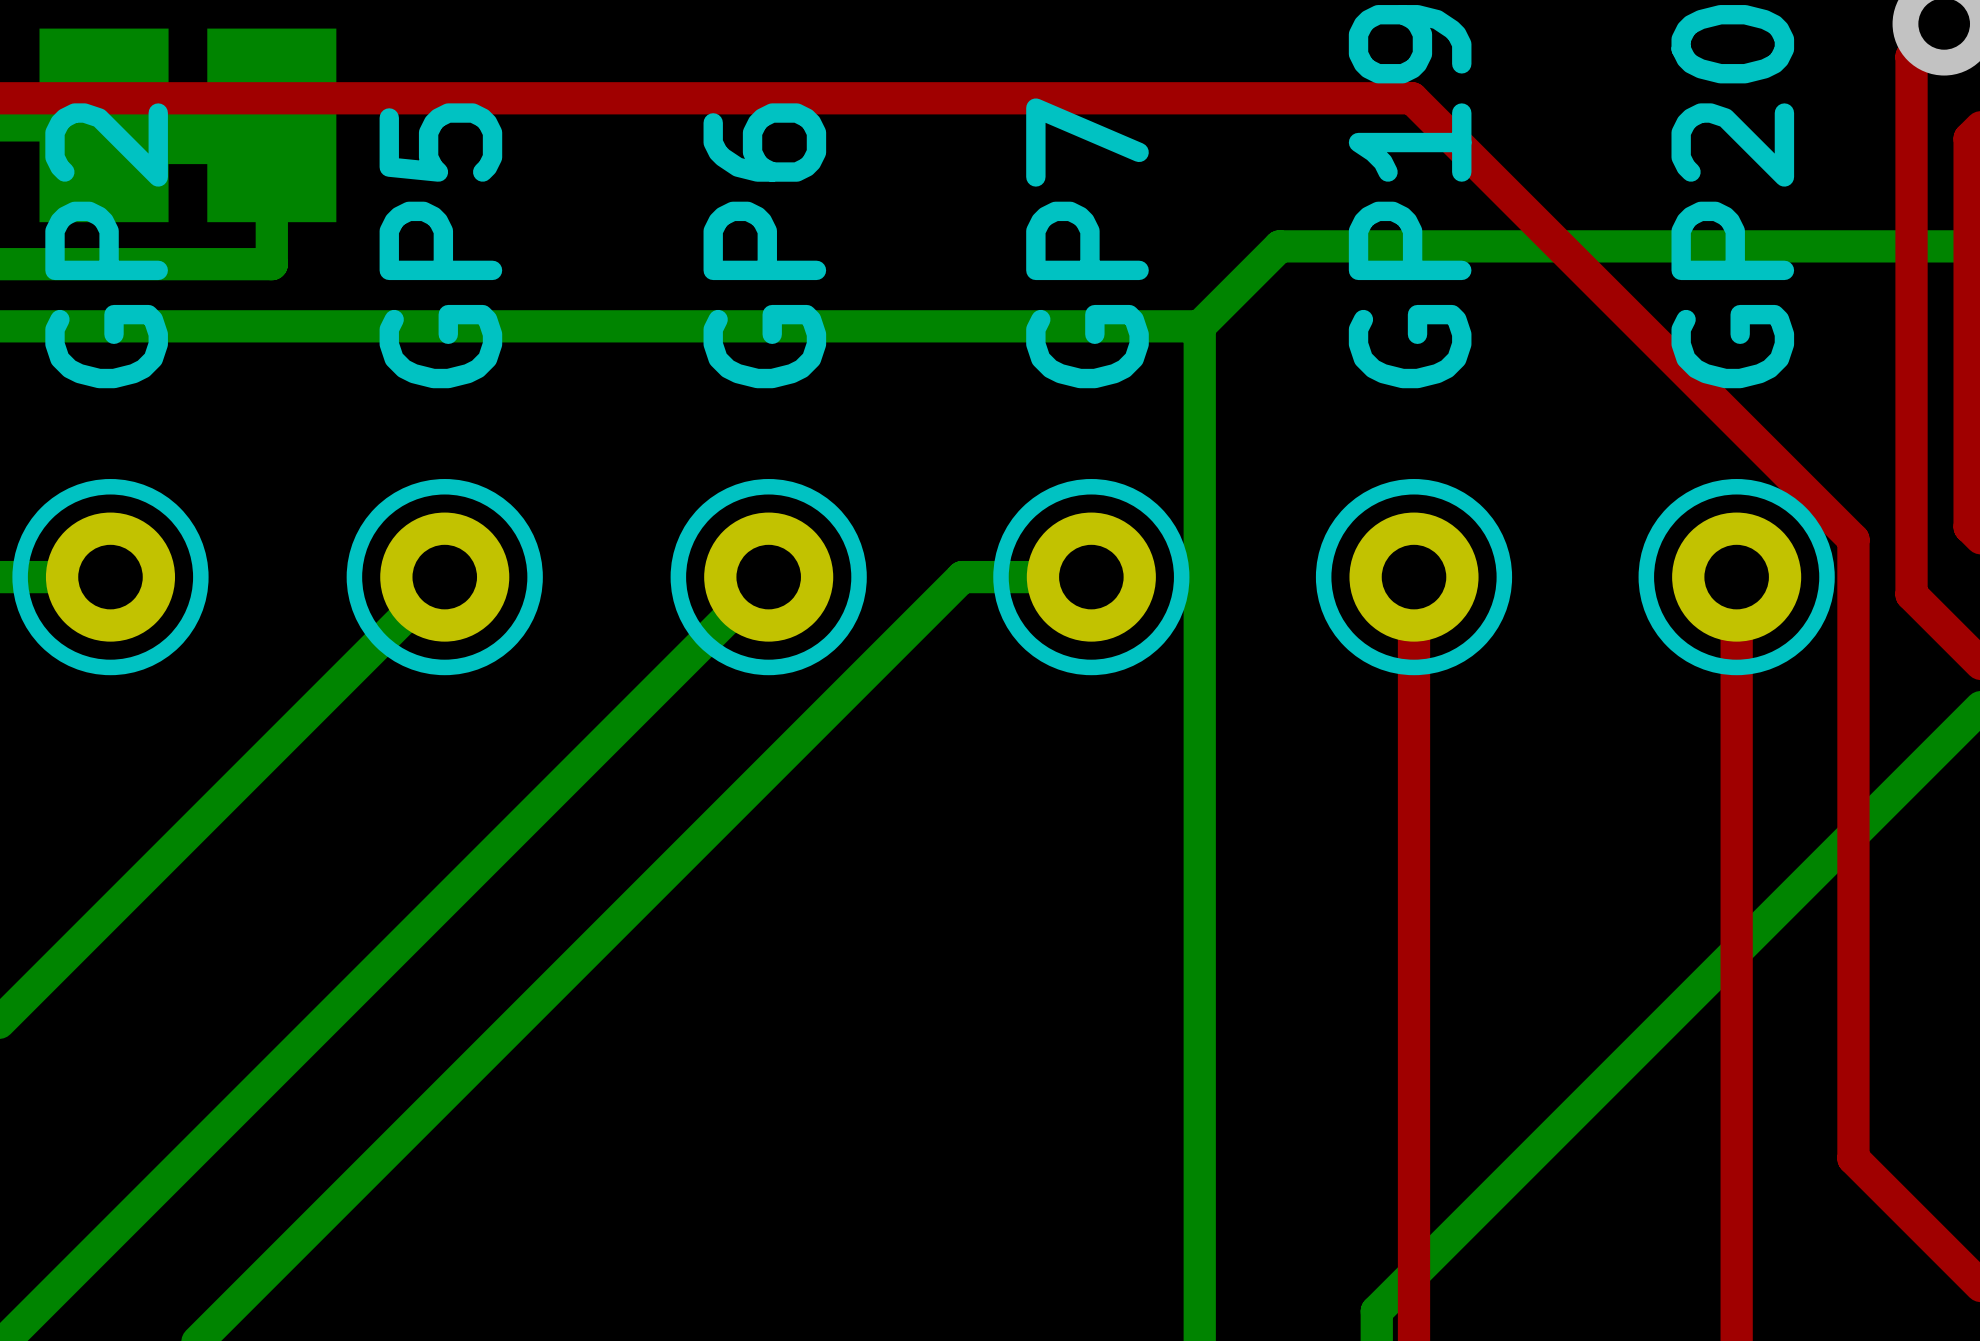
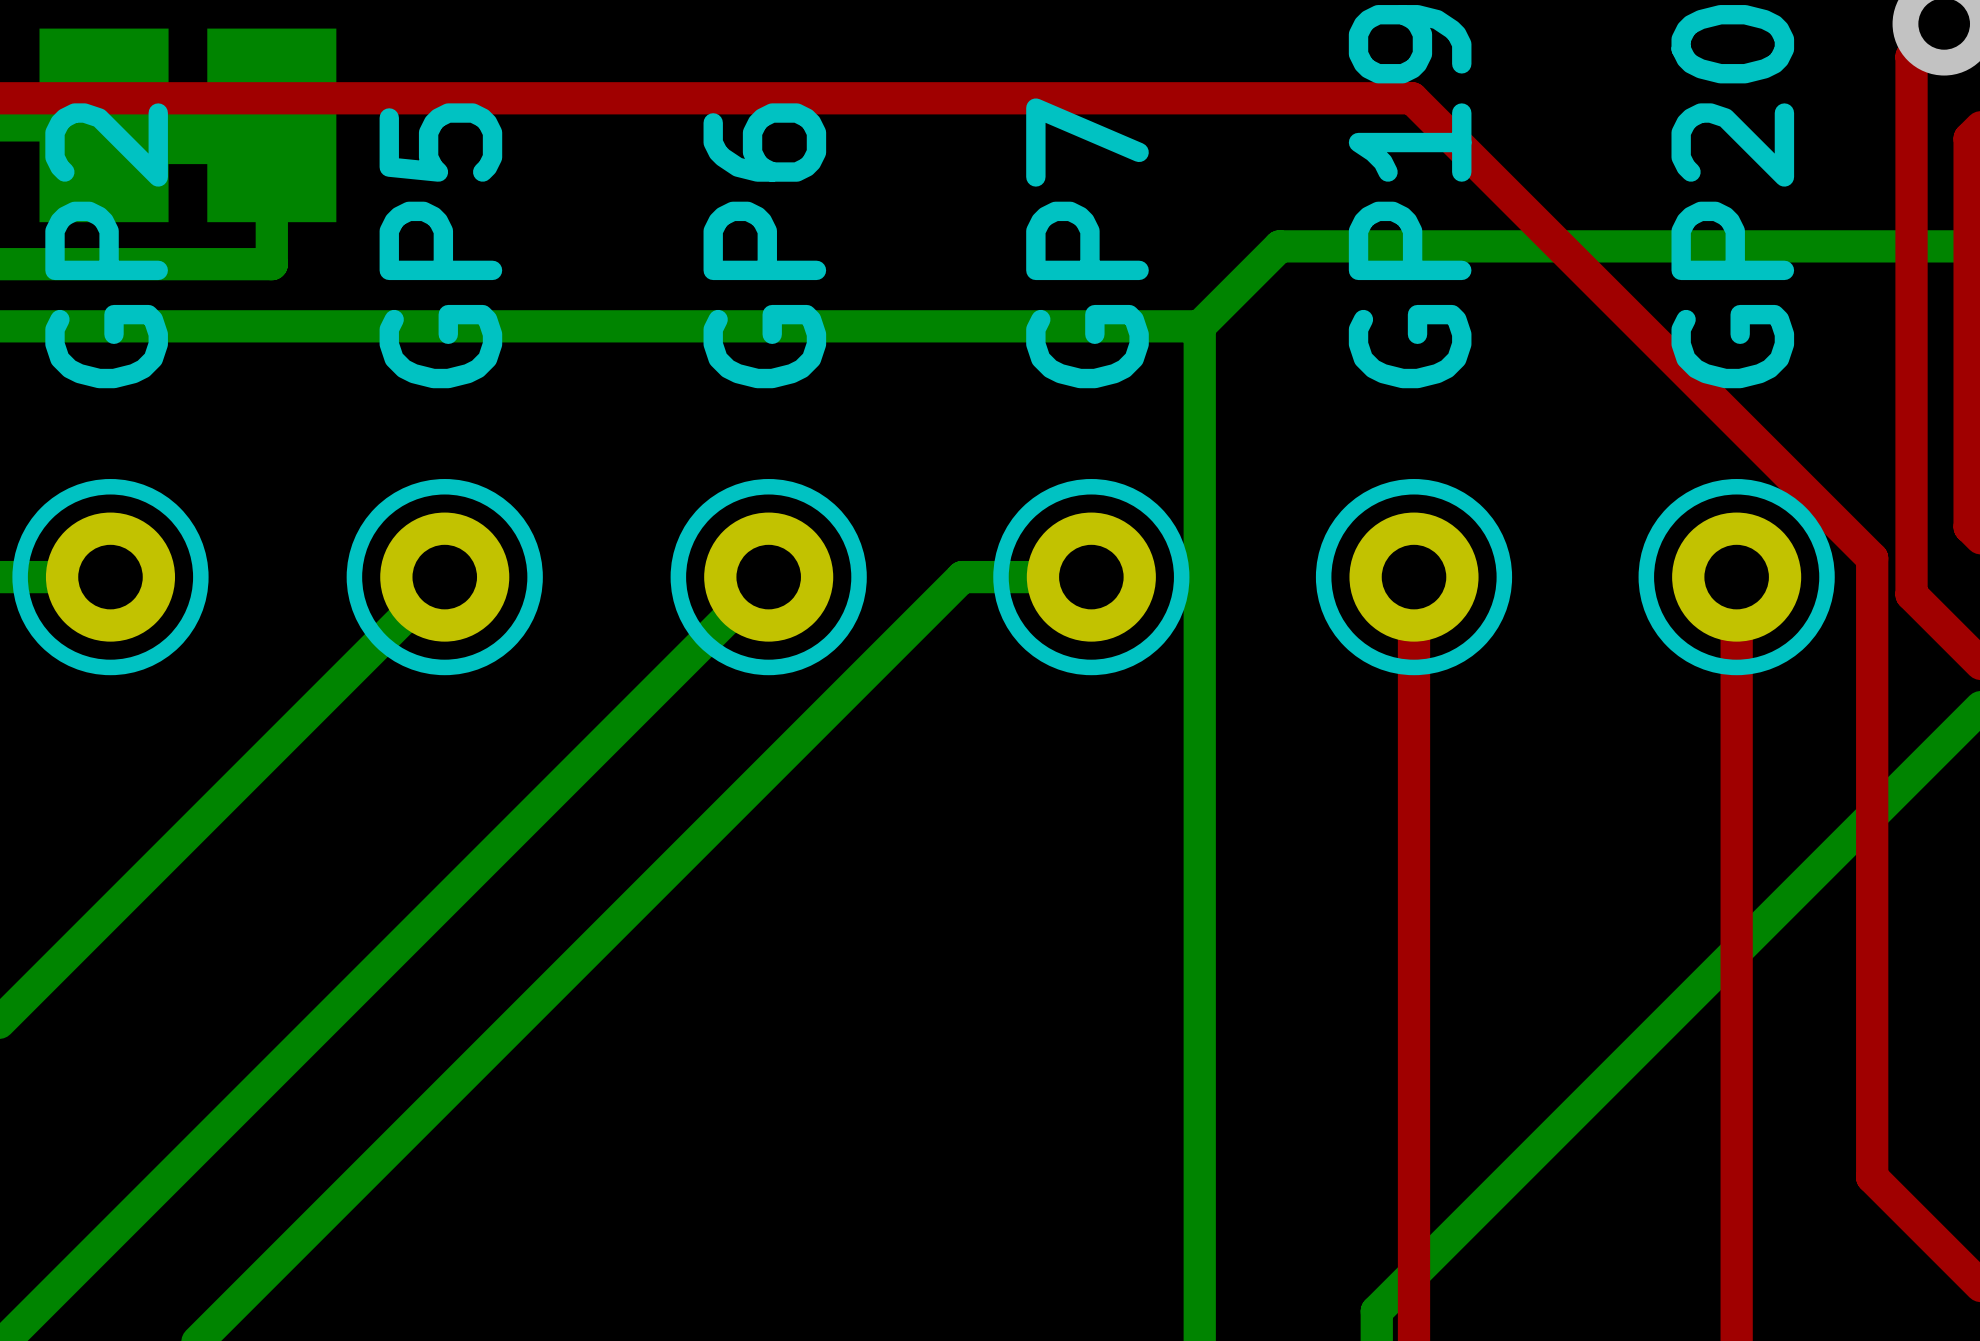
top track: (1853, 539) (1853, 1158) (1872, 1177) -> (1853, 539) (1872, 558) (1872, 1177)

